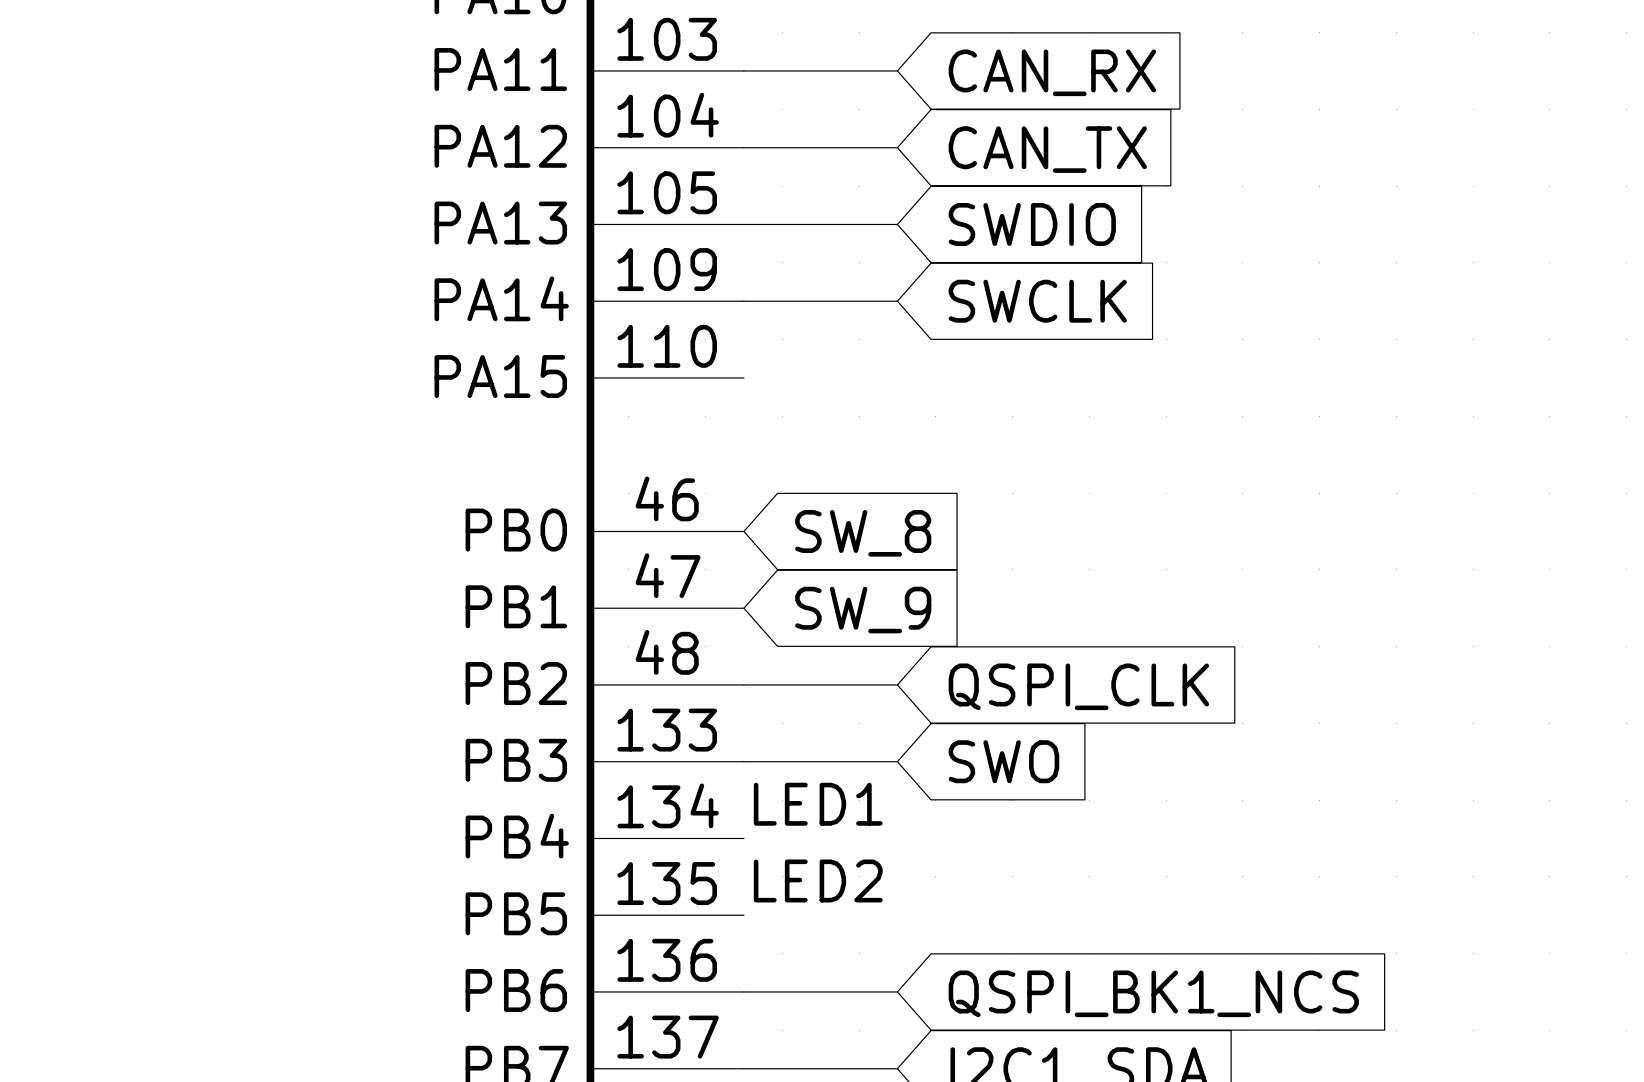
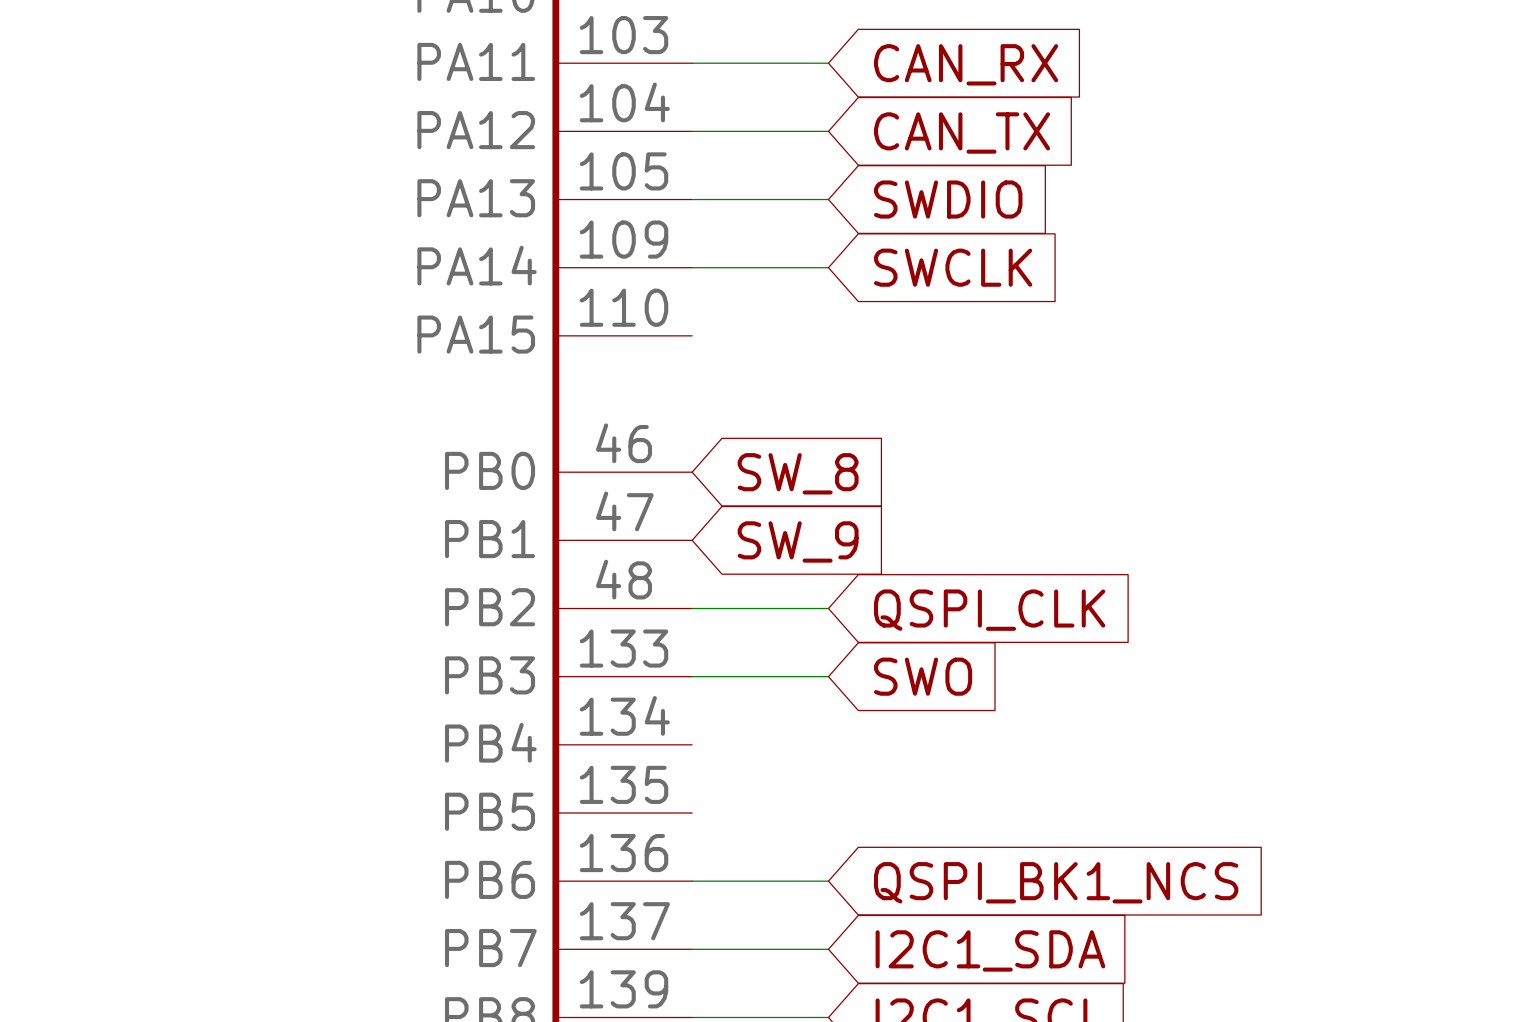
label: LED1 (818, 804) -> none
label: LED2 (818, 880) -> none

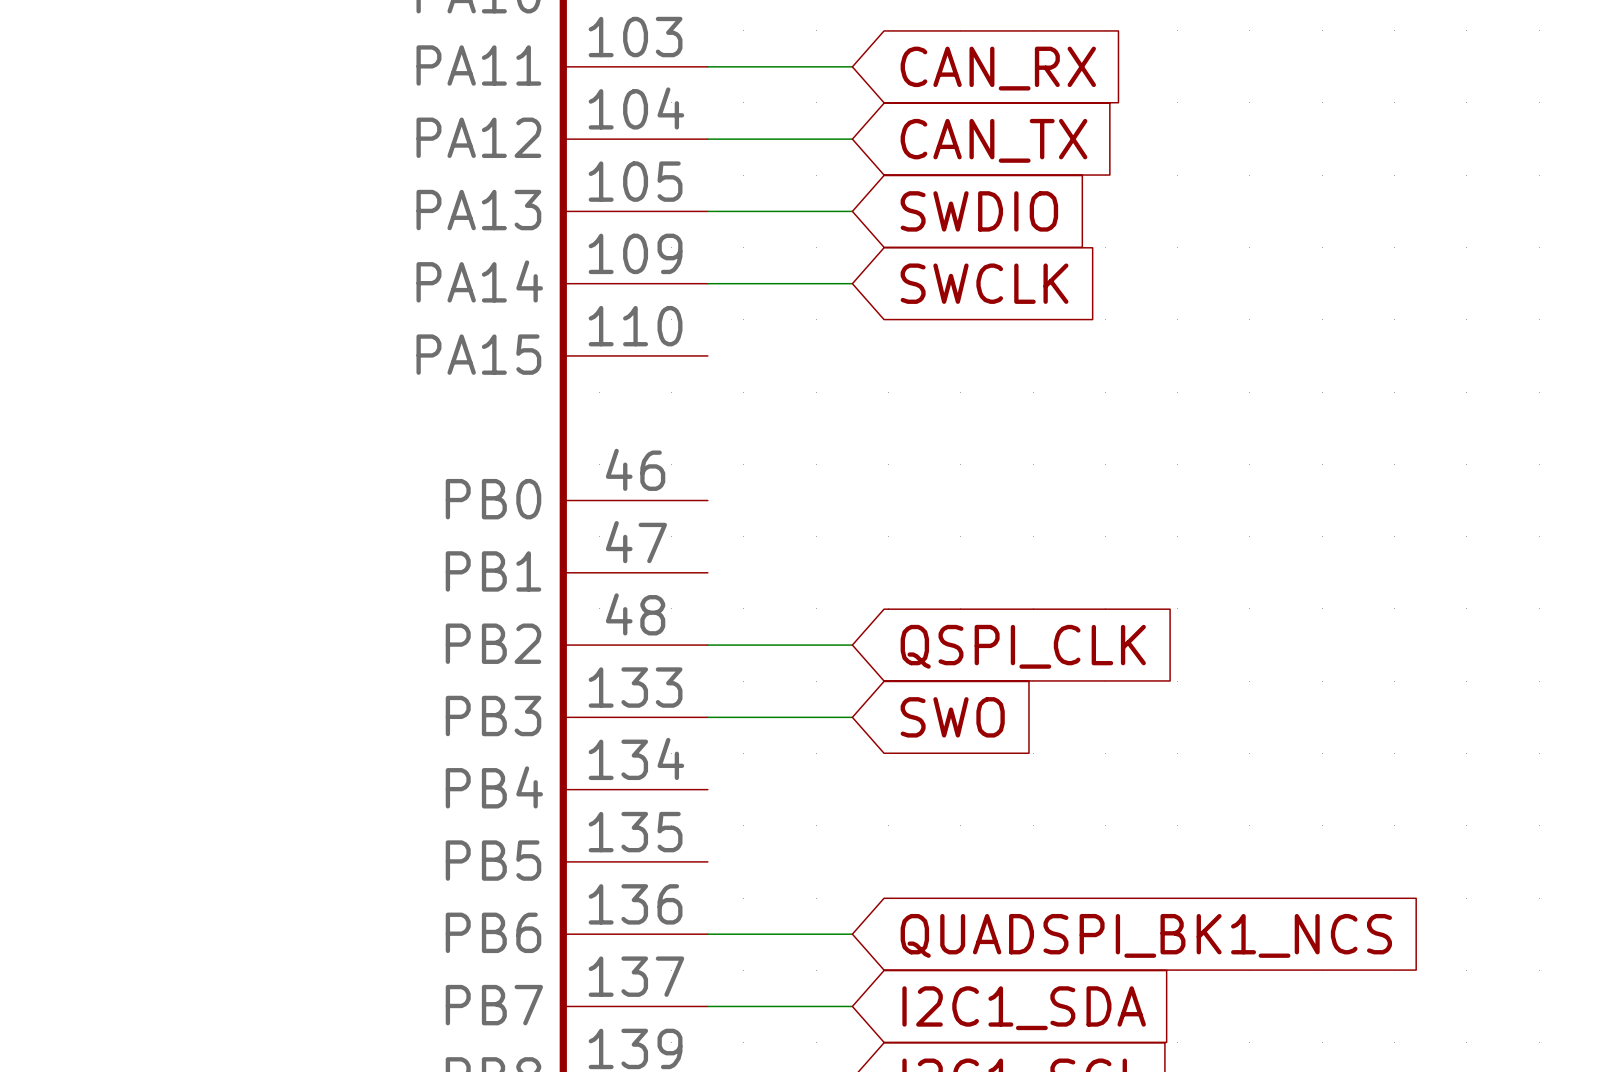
global label: SW_8 (798, 473) -> none
global label: SW_9 (798, 541) -> none
global label: QSPI_BK1_NCS (1056, 882) -> QUADSPI_BK1_NCS (1146, 935)

